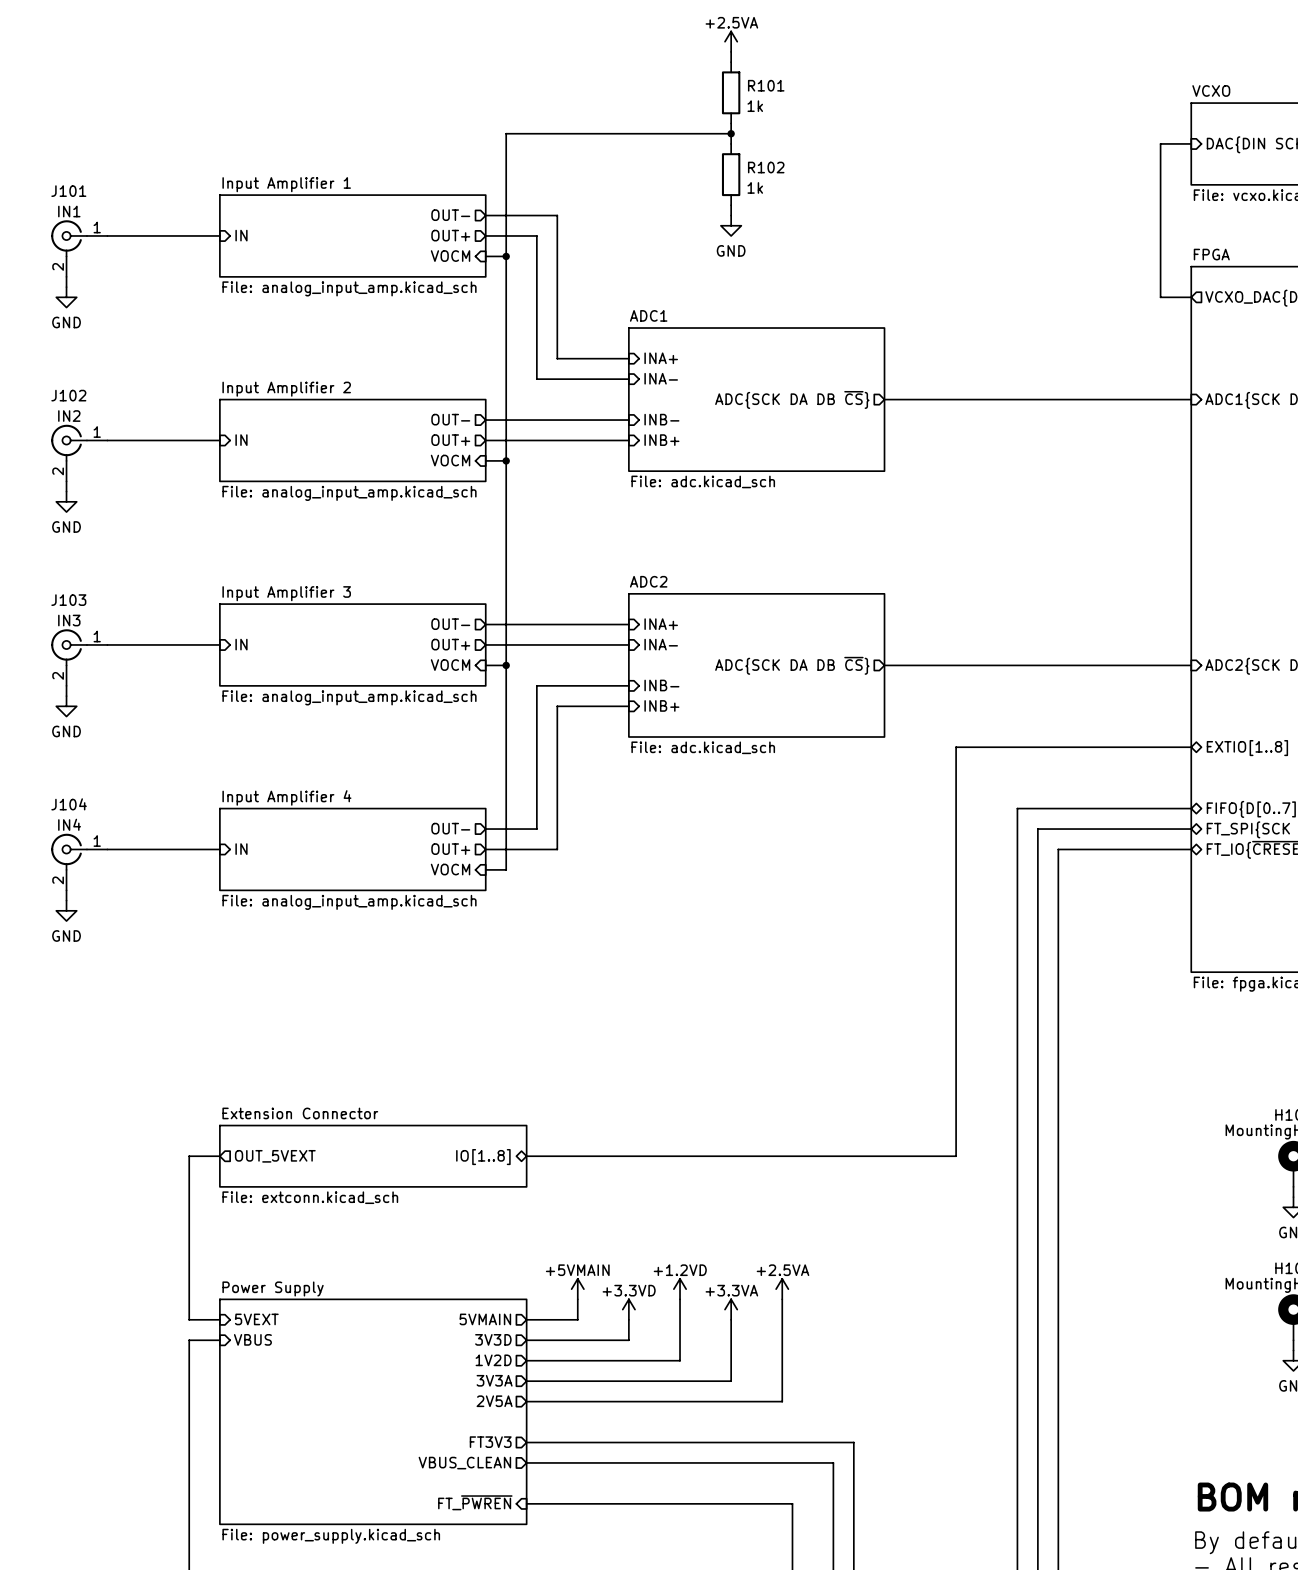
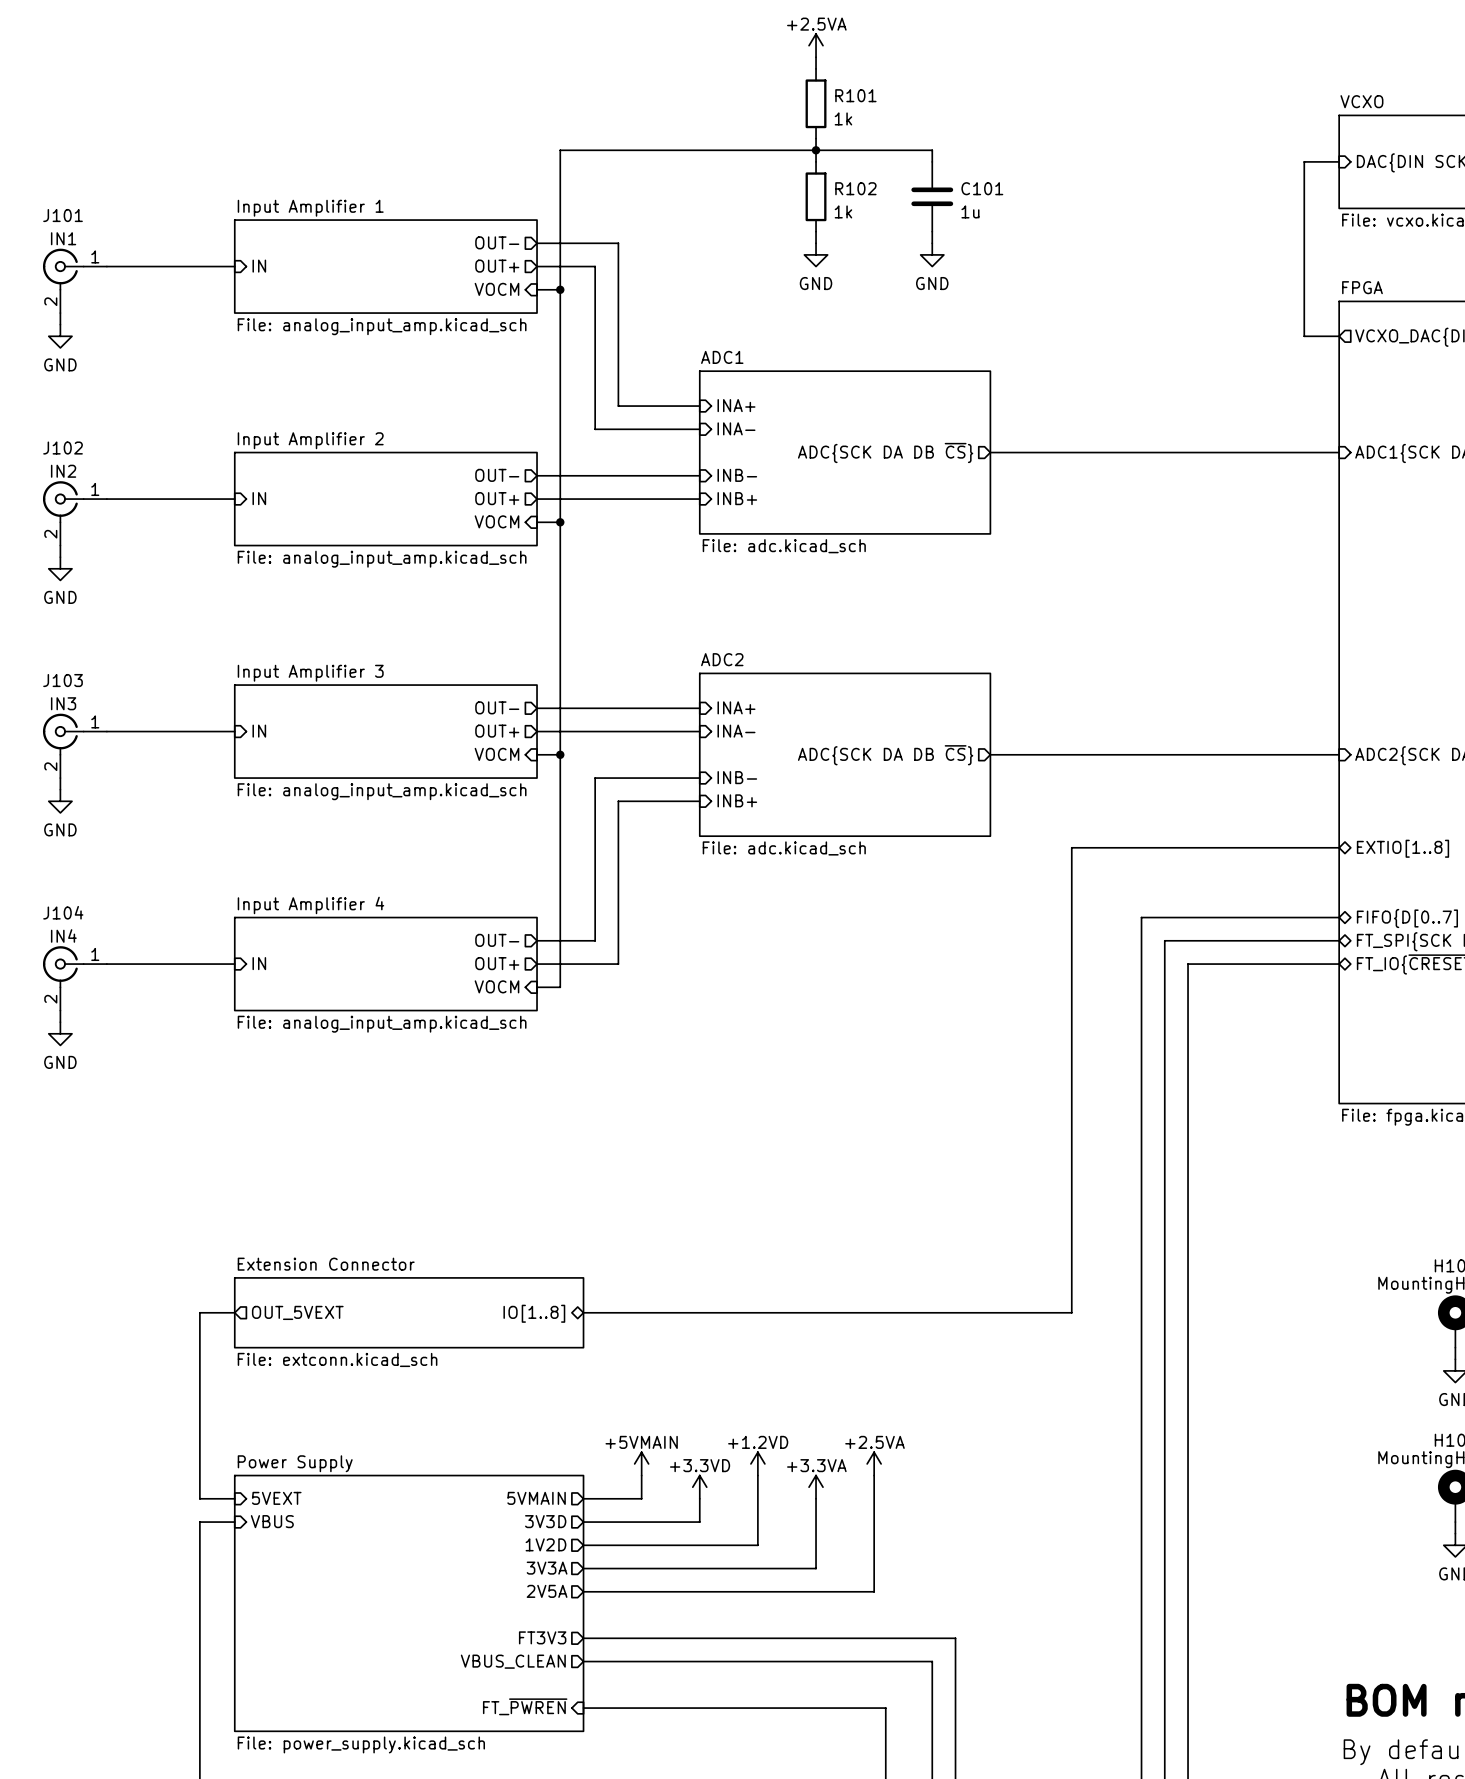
wire: none -> (816, 150) (932, 150) (932, 161)
C101: none -> 1u (932, 196)
wire: none -> (932, 231) (932, 243)
power symbol: none -> GND (932, 254)

